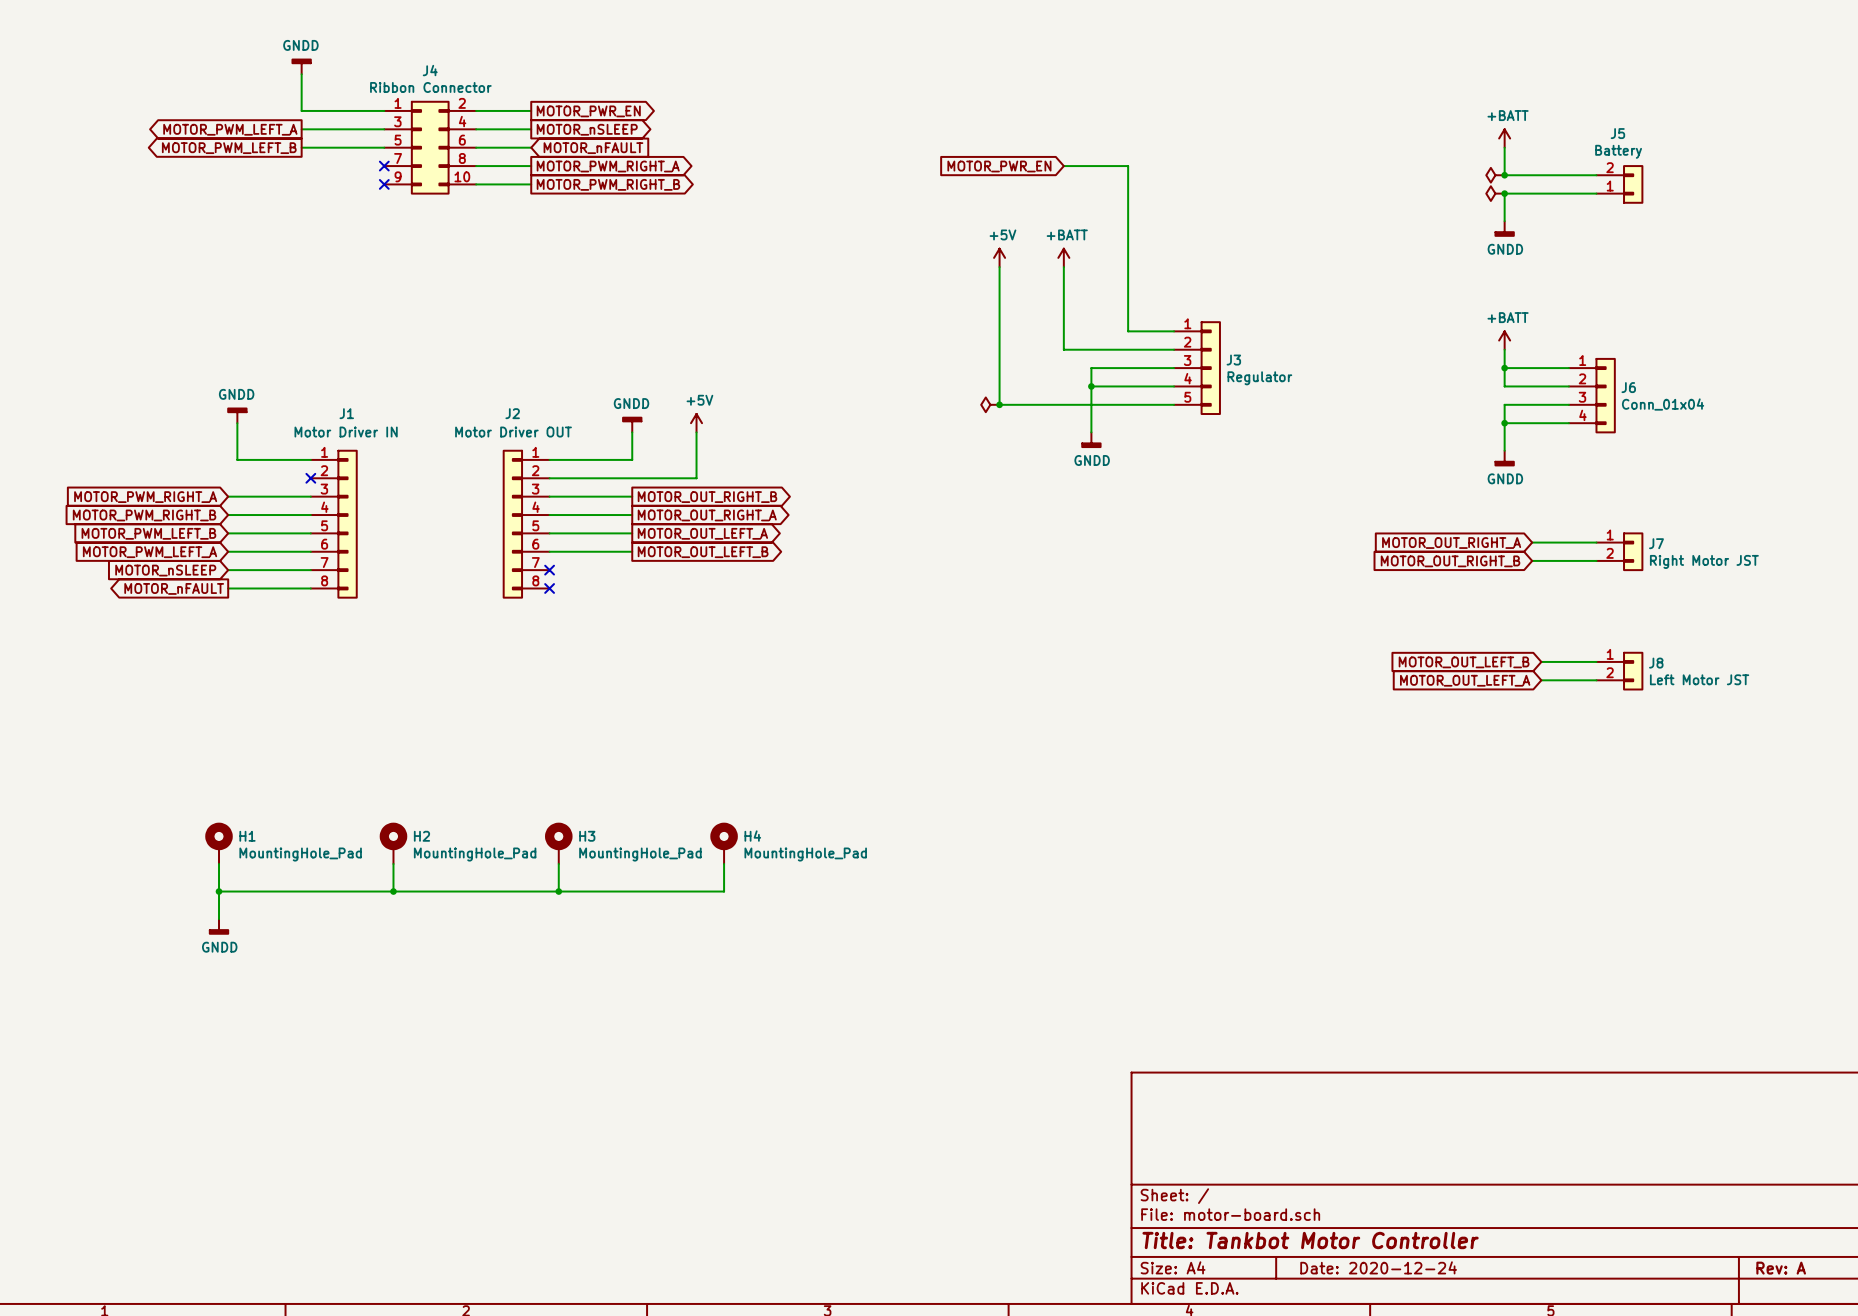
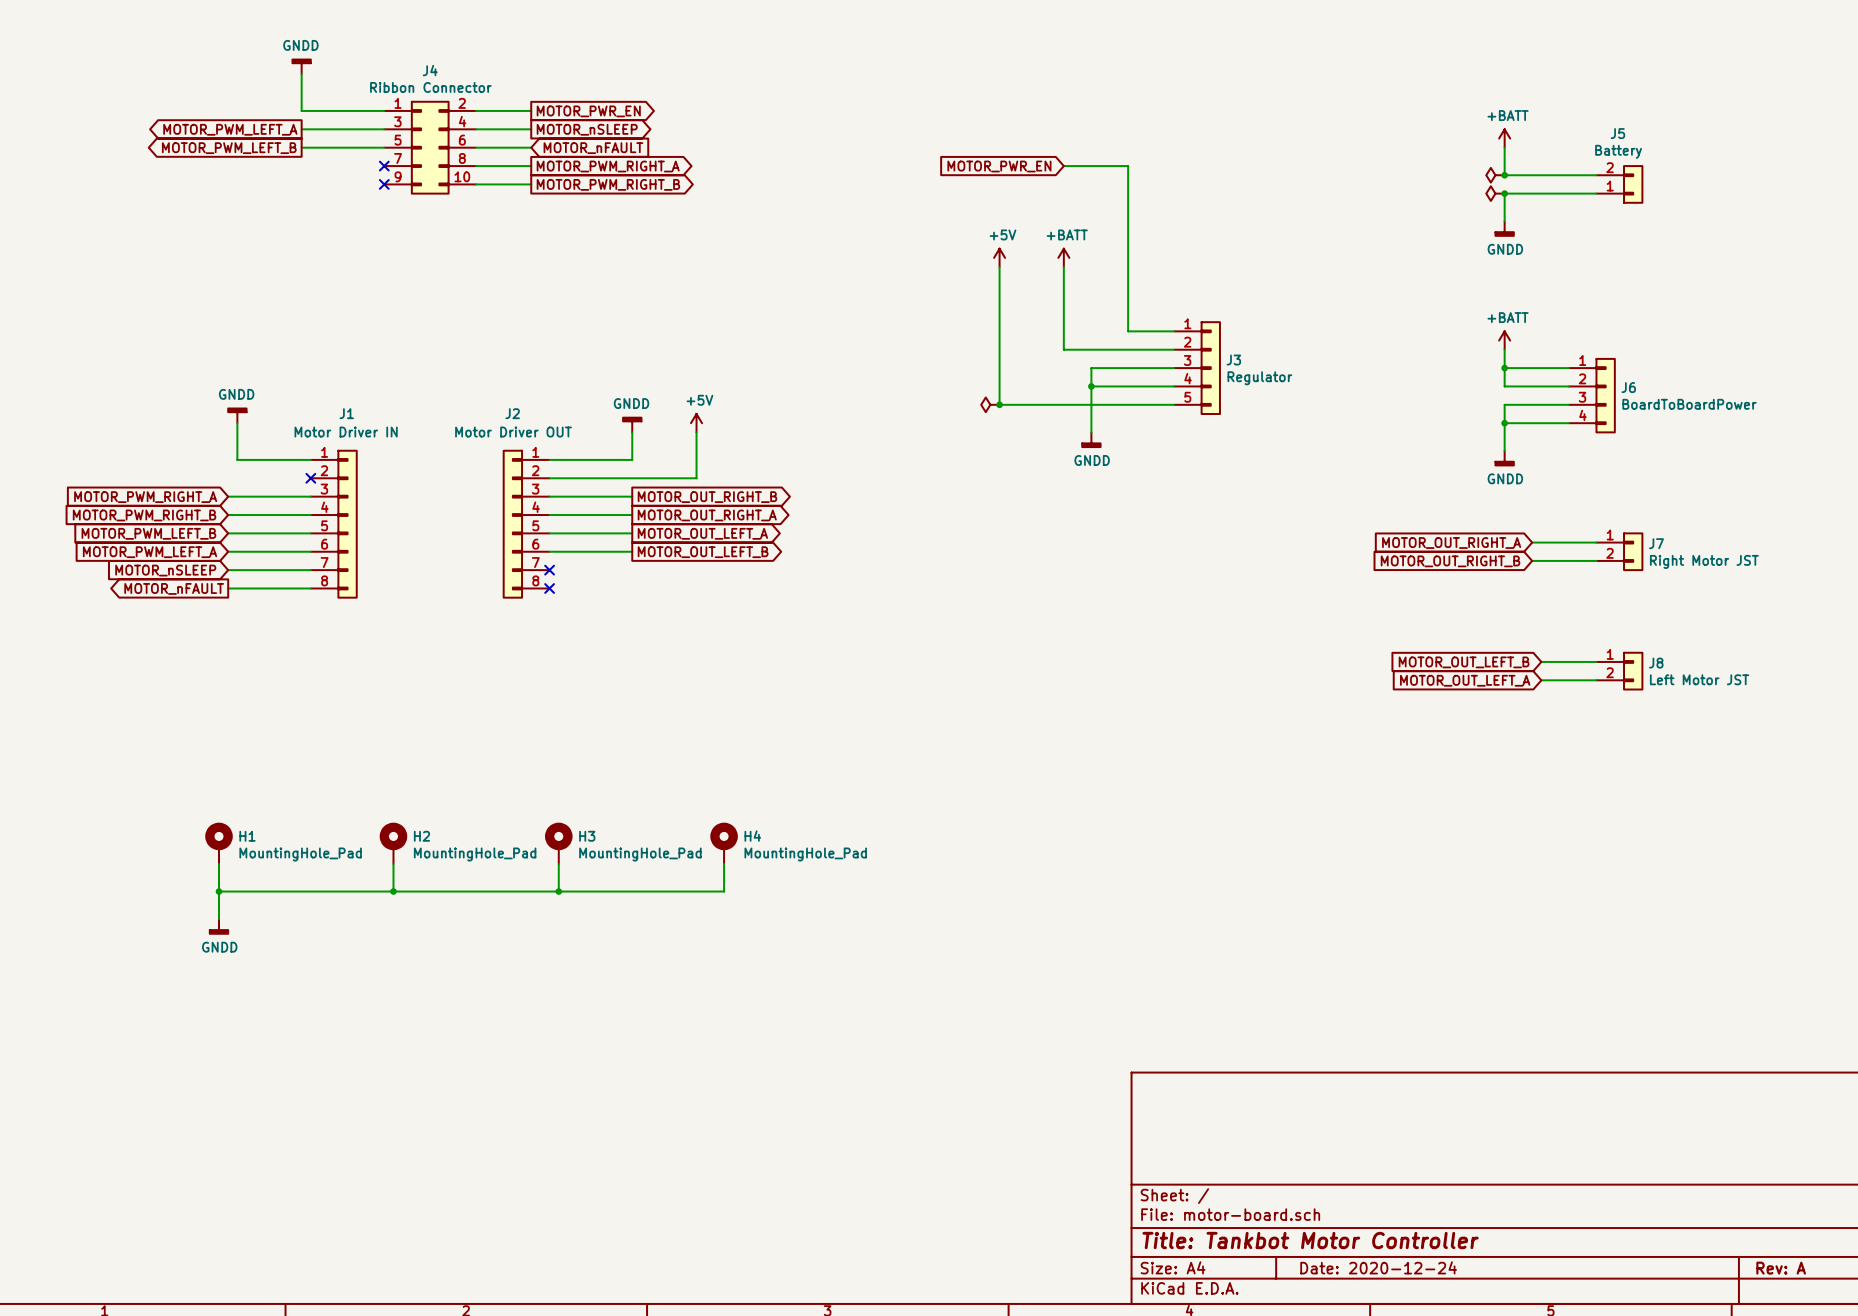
J6 value: Conn_01x04 (1663, 404) -> BoardToBoardPower (1689, 404)

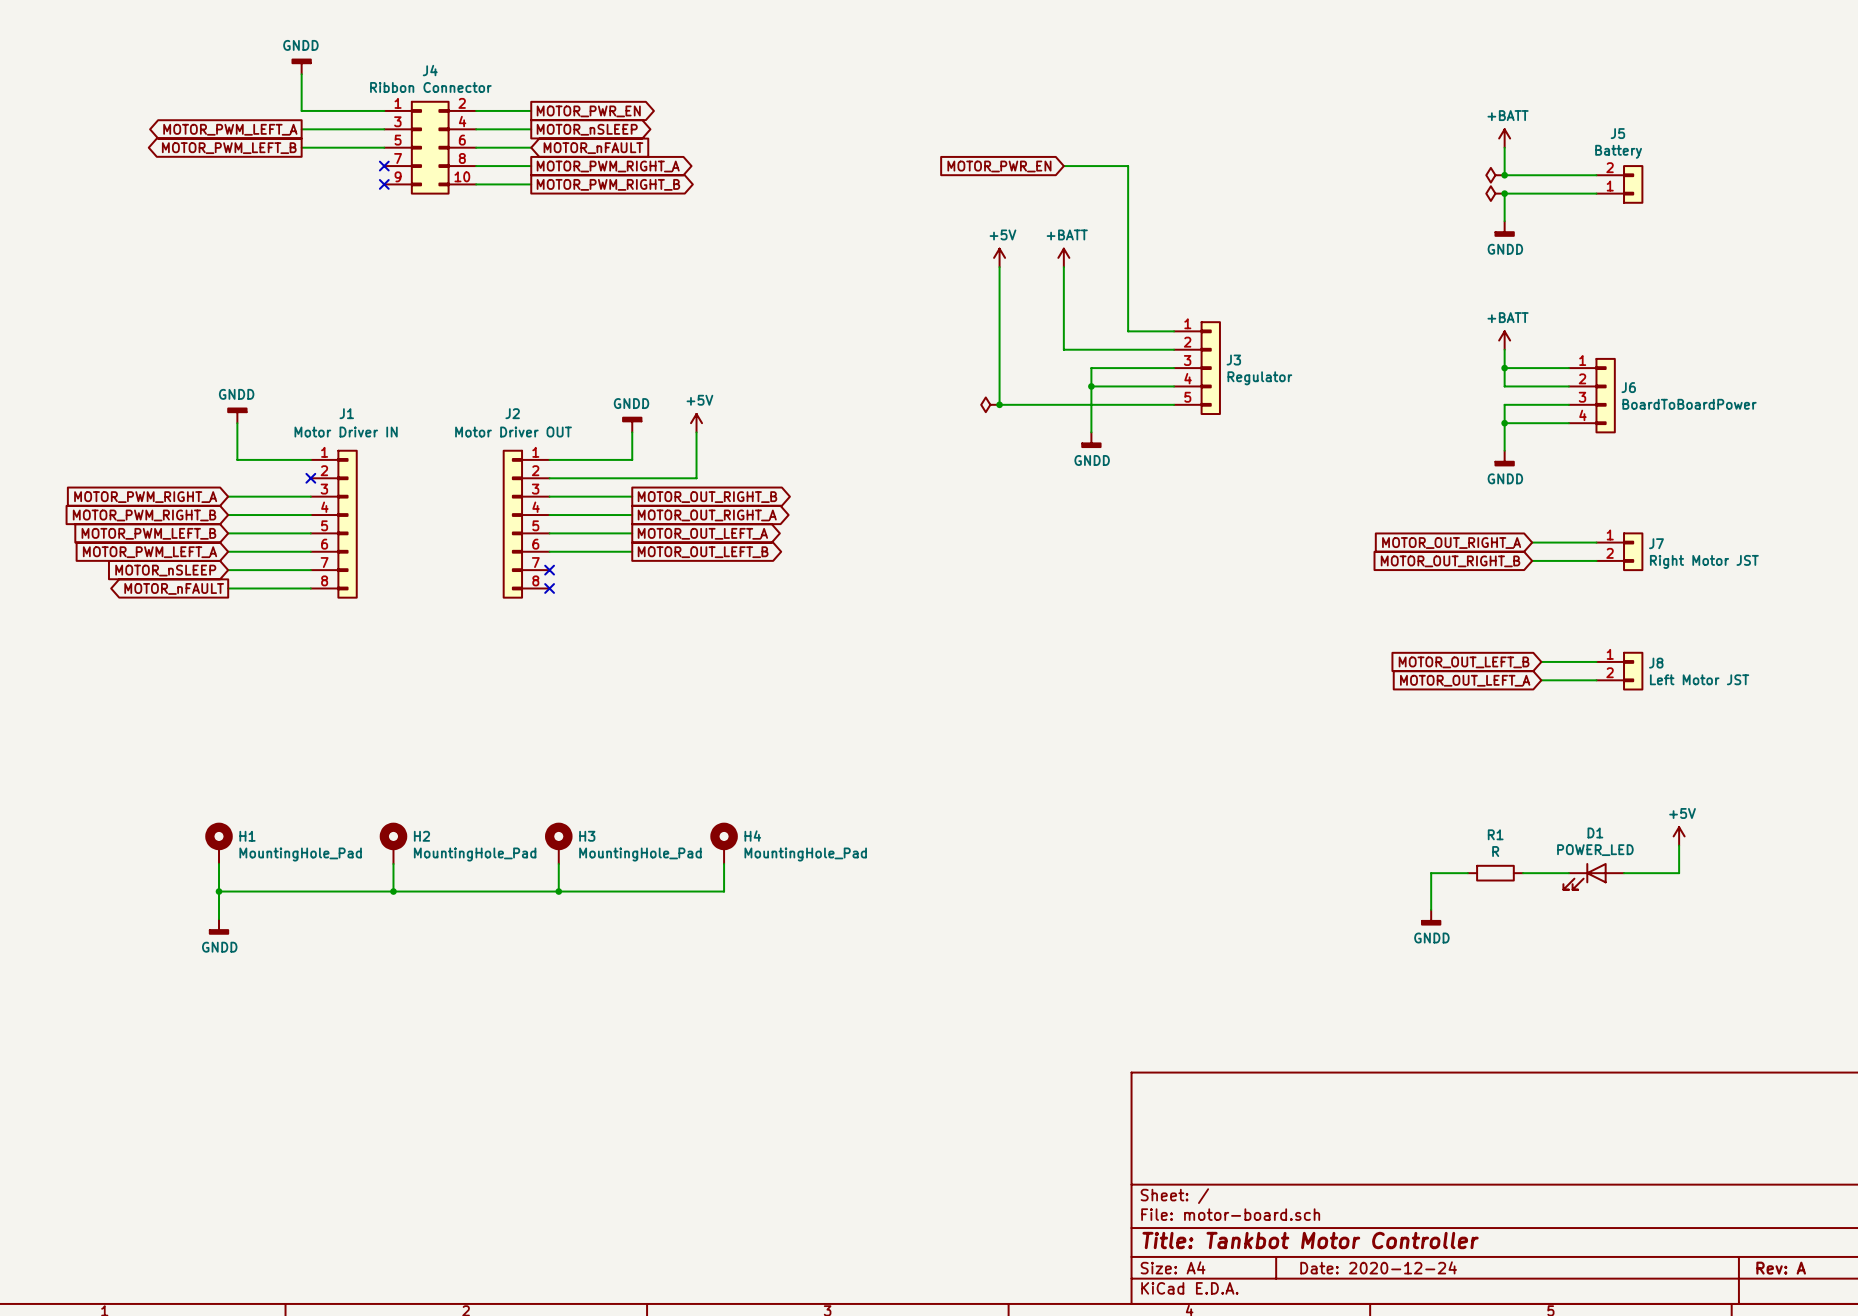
power symbol: none -> +5V (1679, 836)
wire: none -> (1679, 845) (1679, 873) (1624, 873)
wire: none -> (1467, 873) (1431, 873) (1431, 909)
R1: none -> R (1495, 873)
wire: none -> (1523, 873) (1568, 873)
D1: none -> POWER_LED (1593, 876)
power symbol: none -> GNDD (1431, 917)

